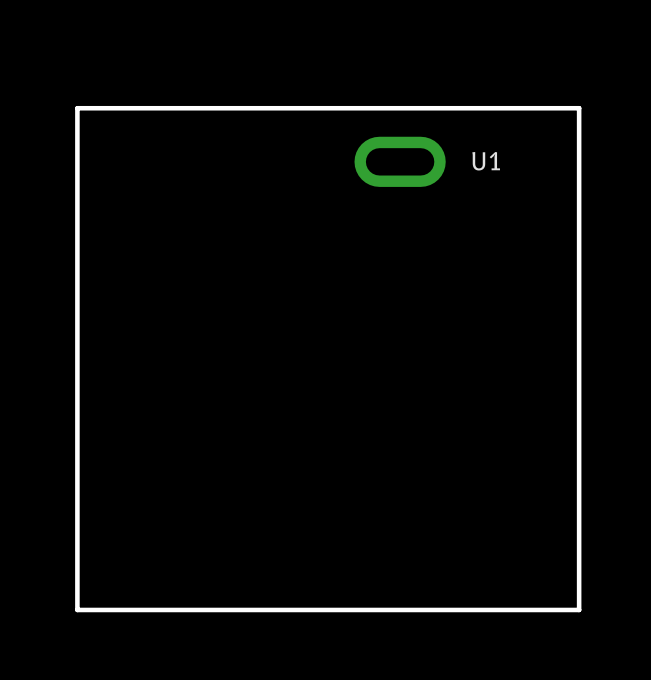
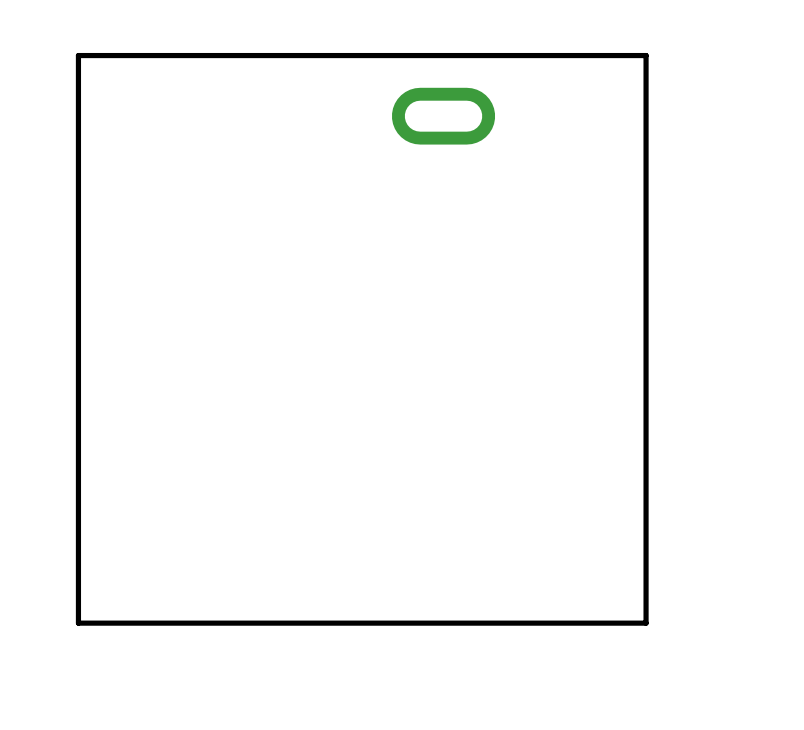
U1 name: U1 (486, 161) -> none

